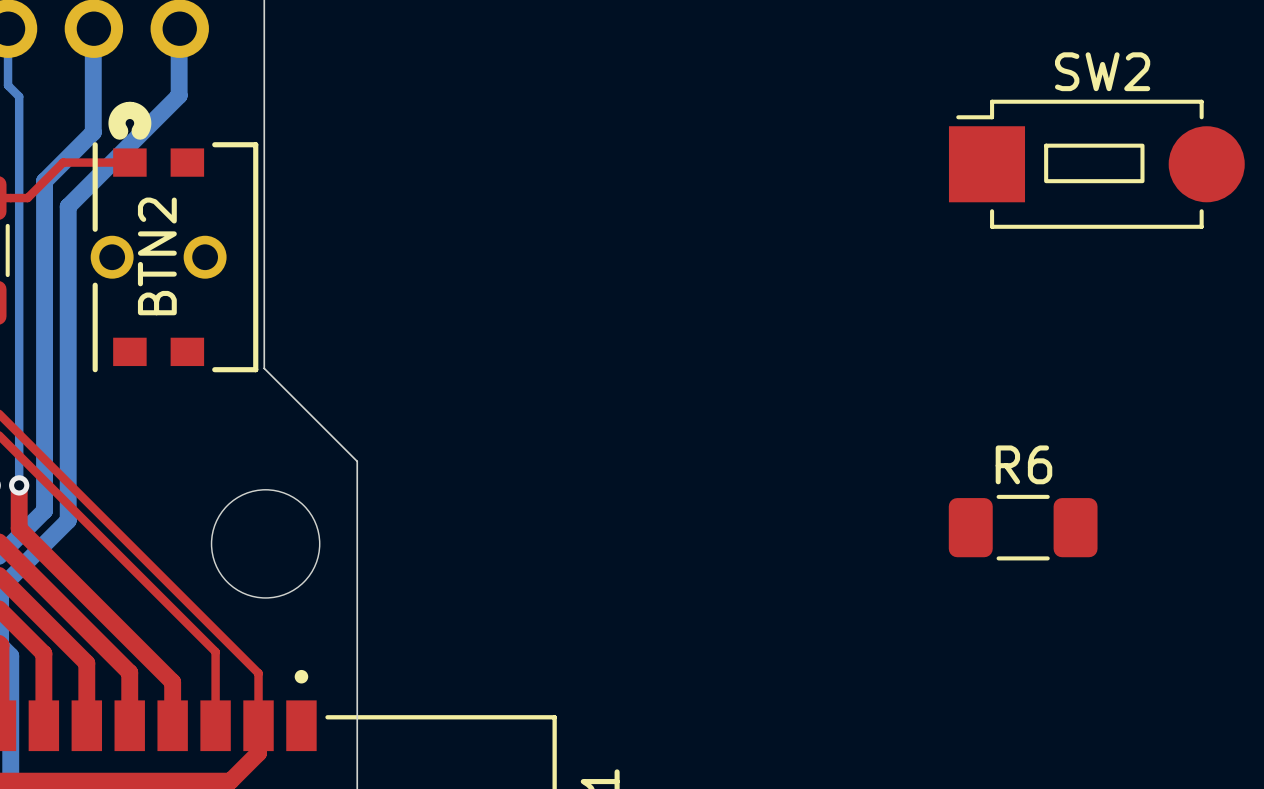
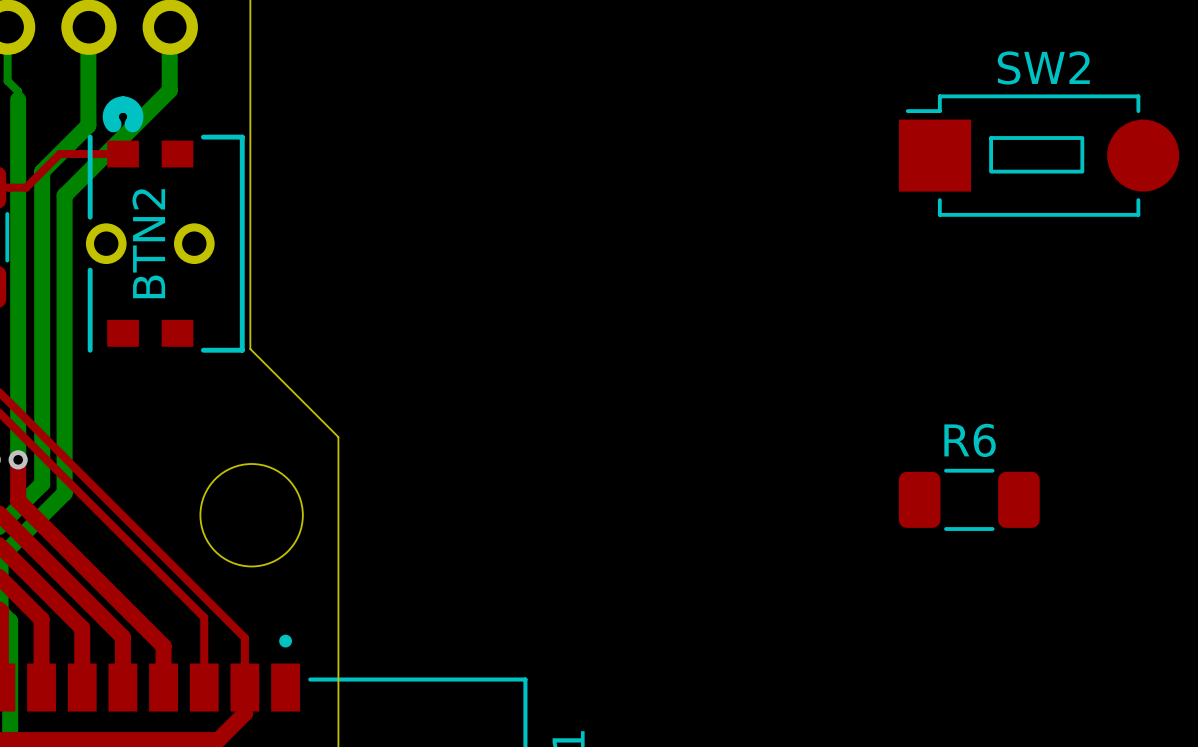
bottom track width: thin (19, 105) (19, 485) -> thick (18, 99) (18, 459)

